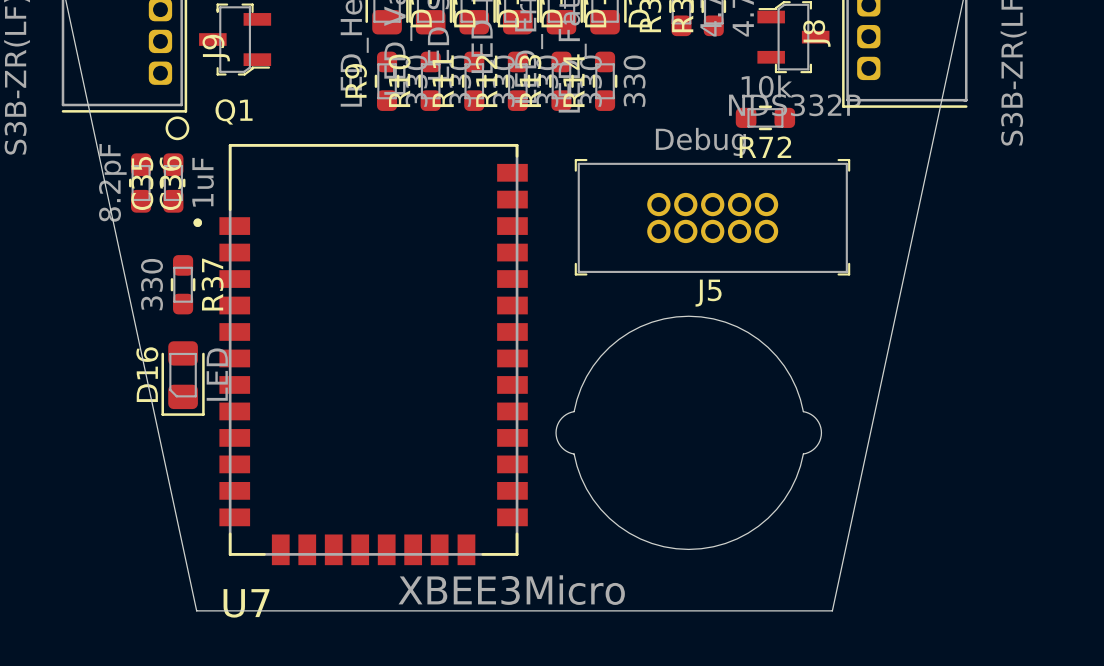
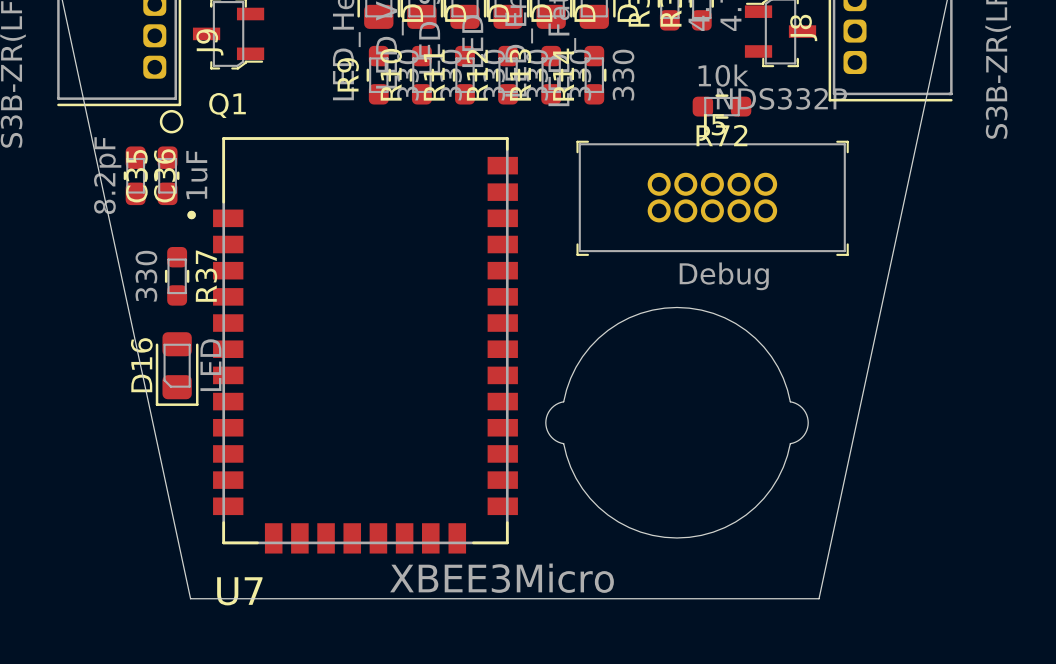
R72 position: (765, 117) -> (721, 106)
J5 rotation: 0° (712, 217) -> 180° (712, 198)

